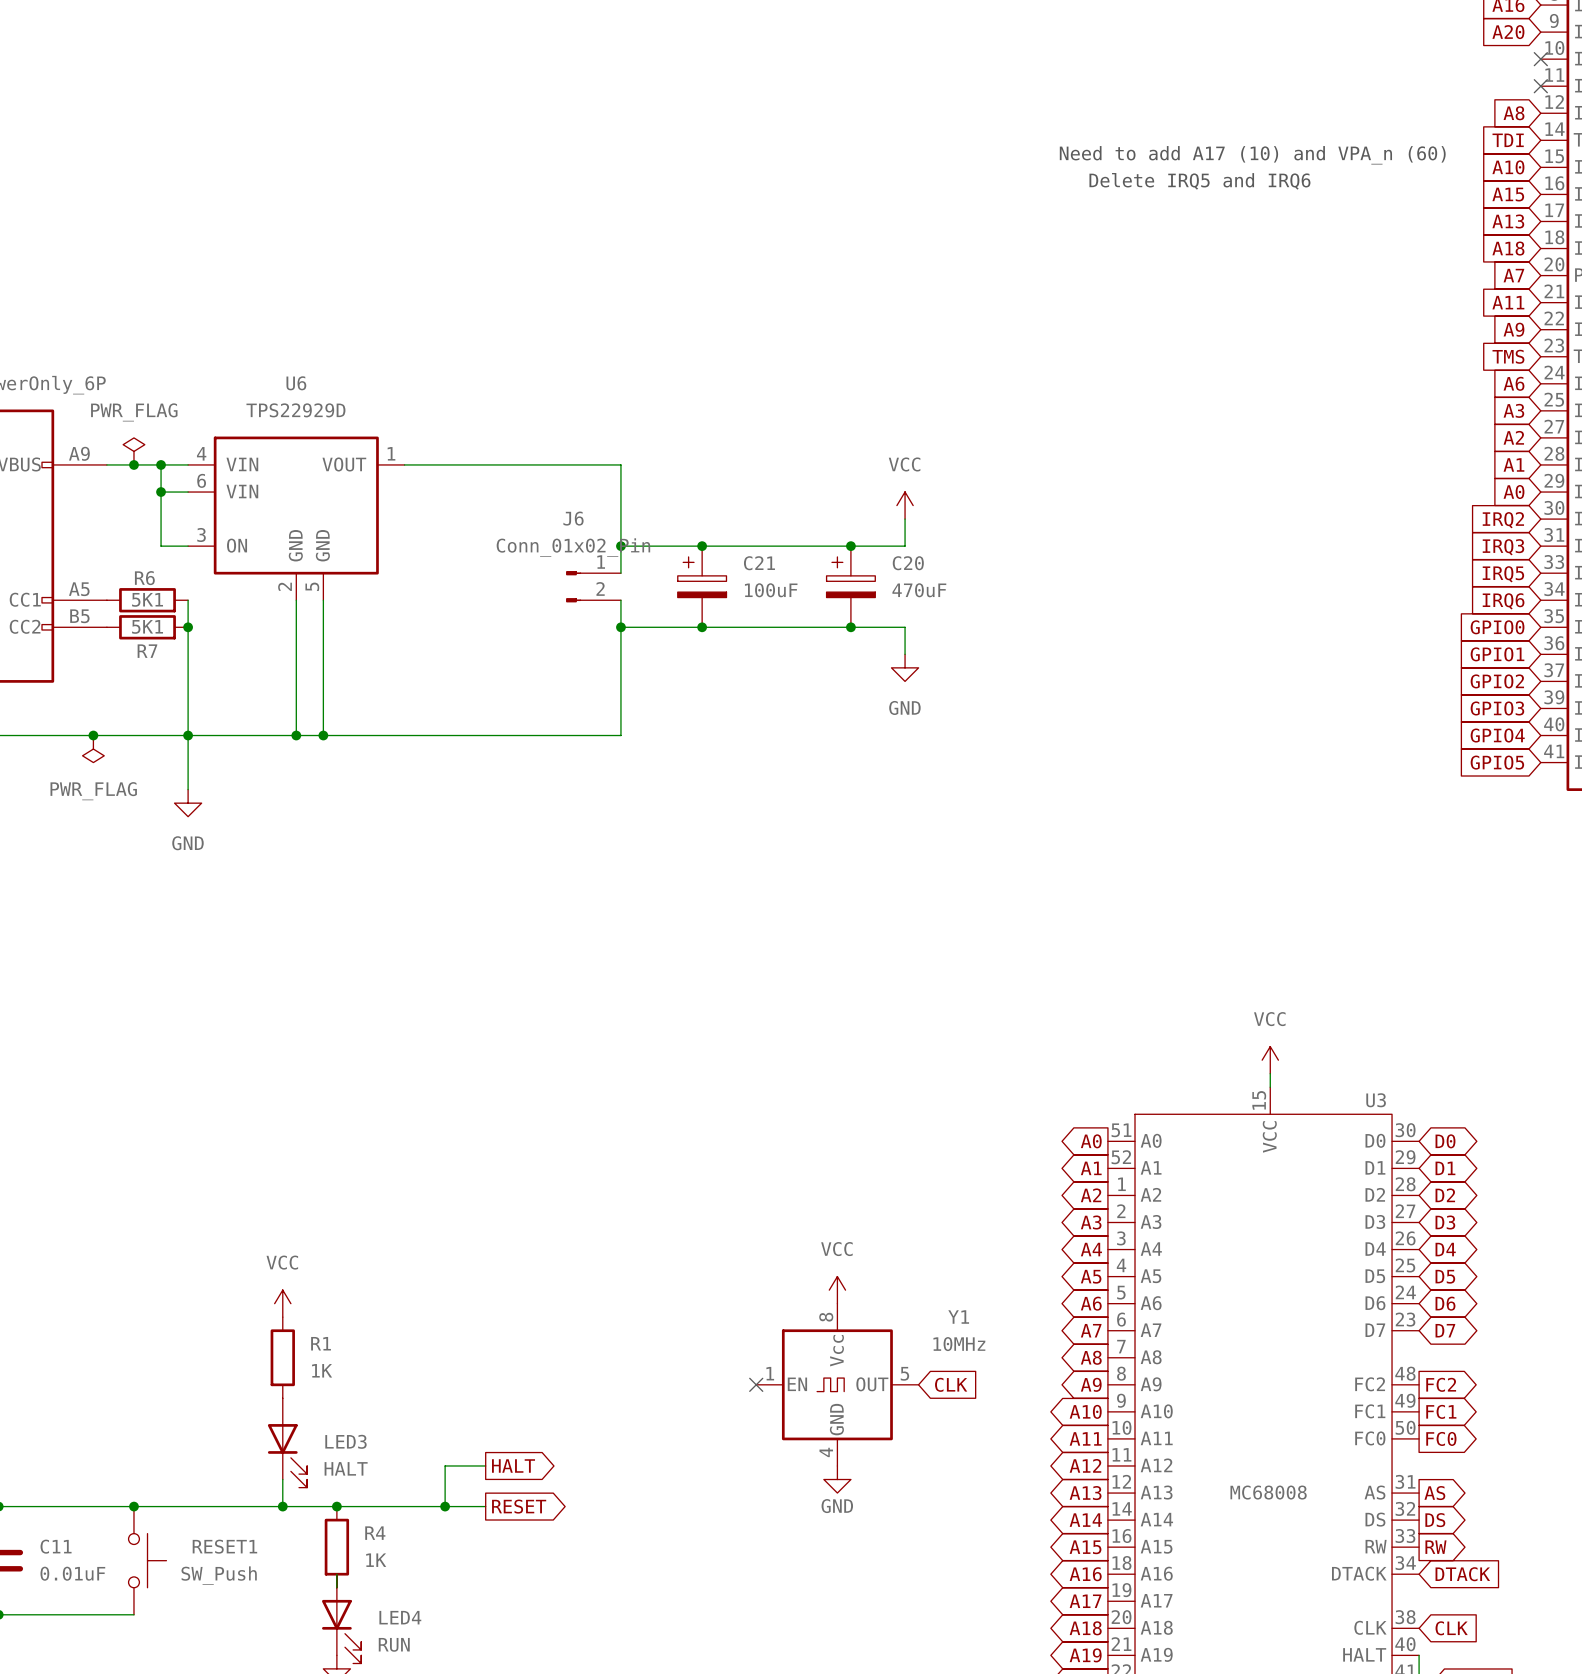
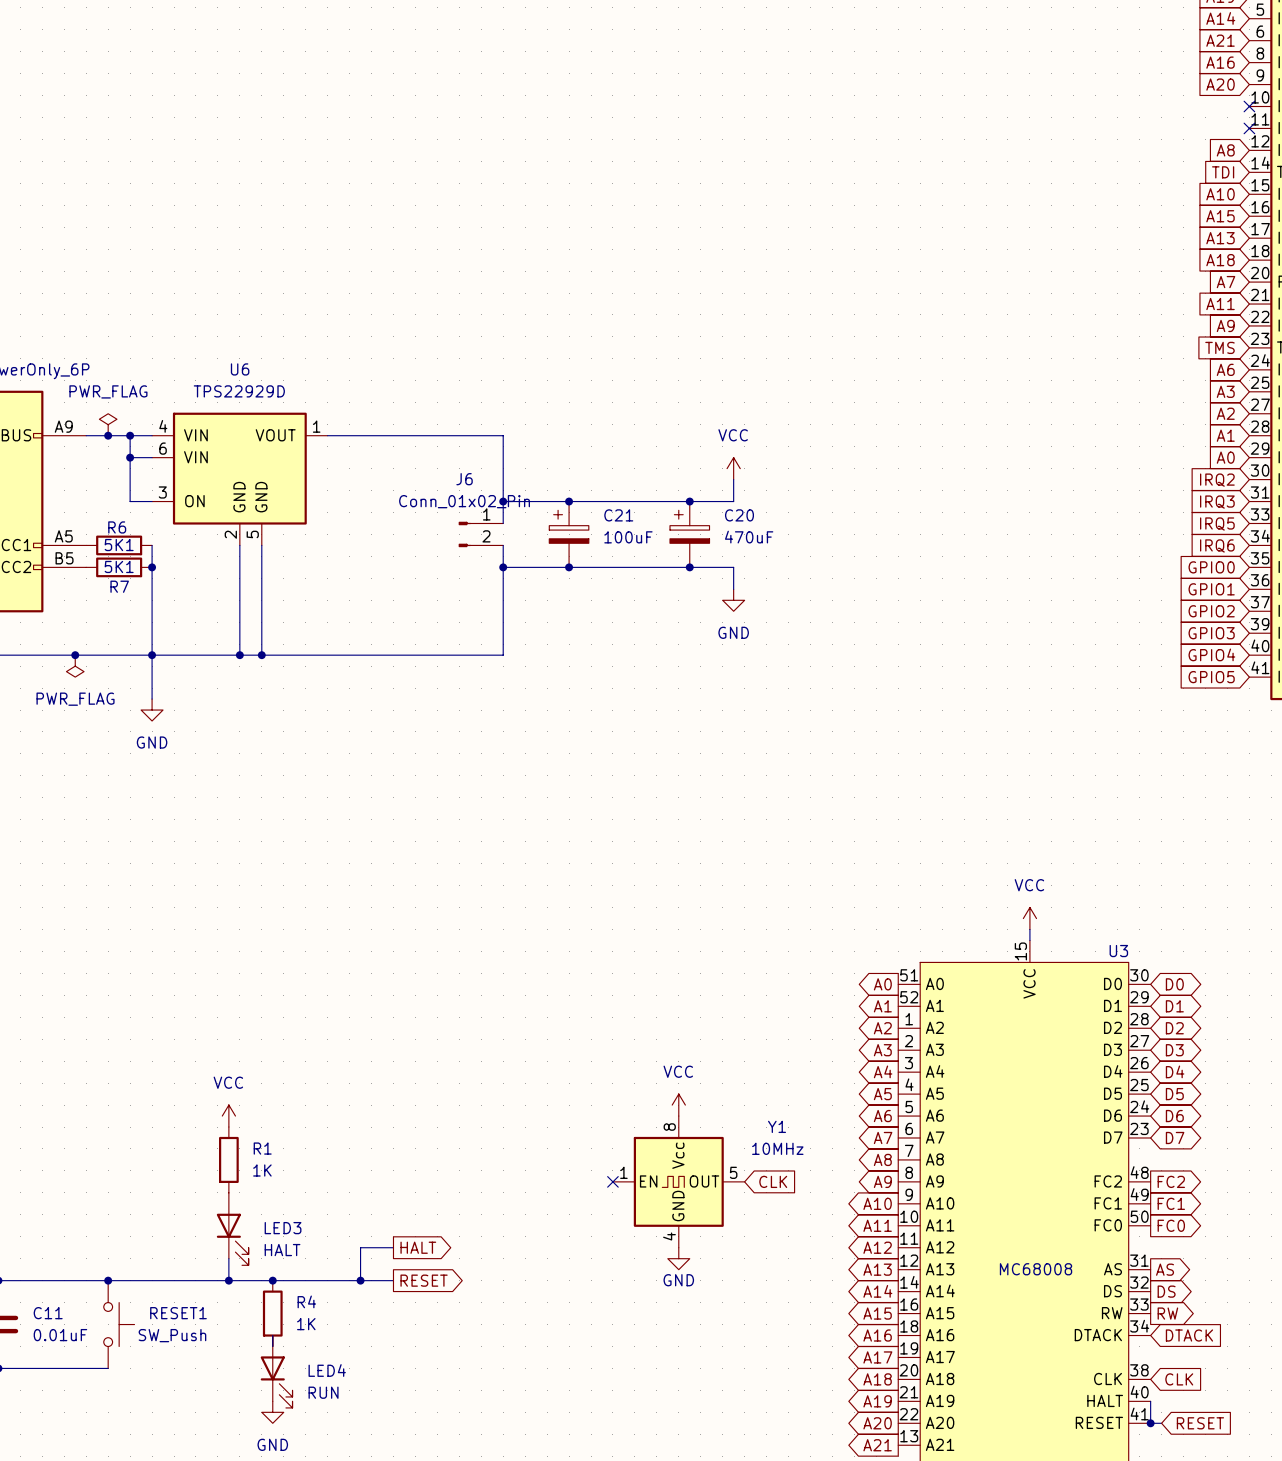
text: Need to add A17 (10) and VPA_n (60) (1252, 155) -> none
text: Delete IRQ5 and IRQ6 (1199, 181) -> none

